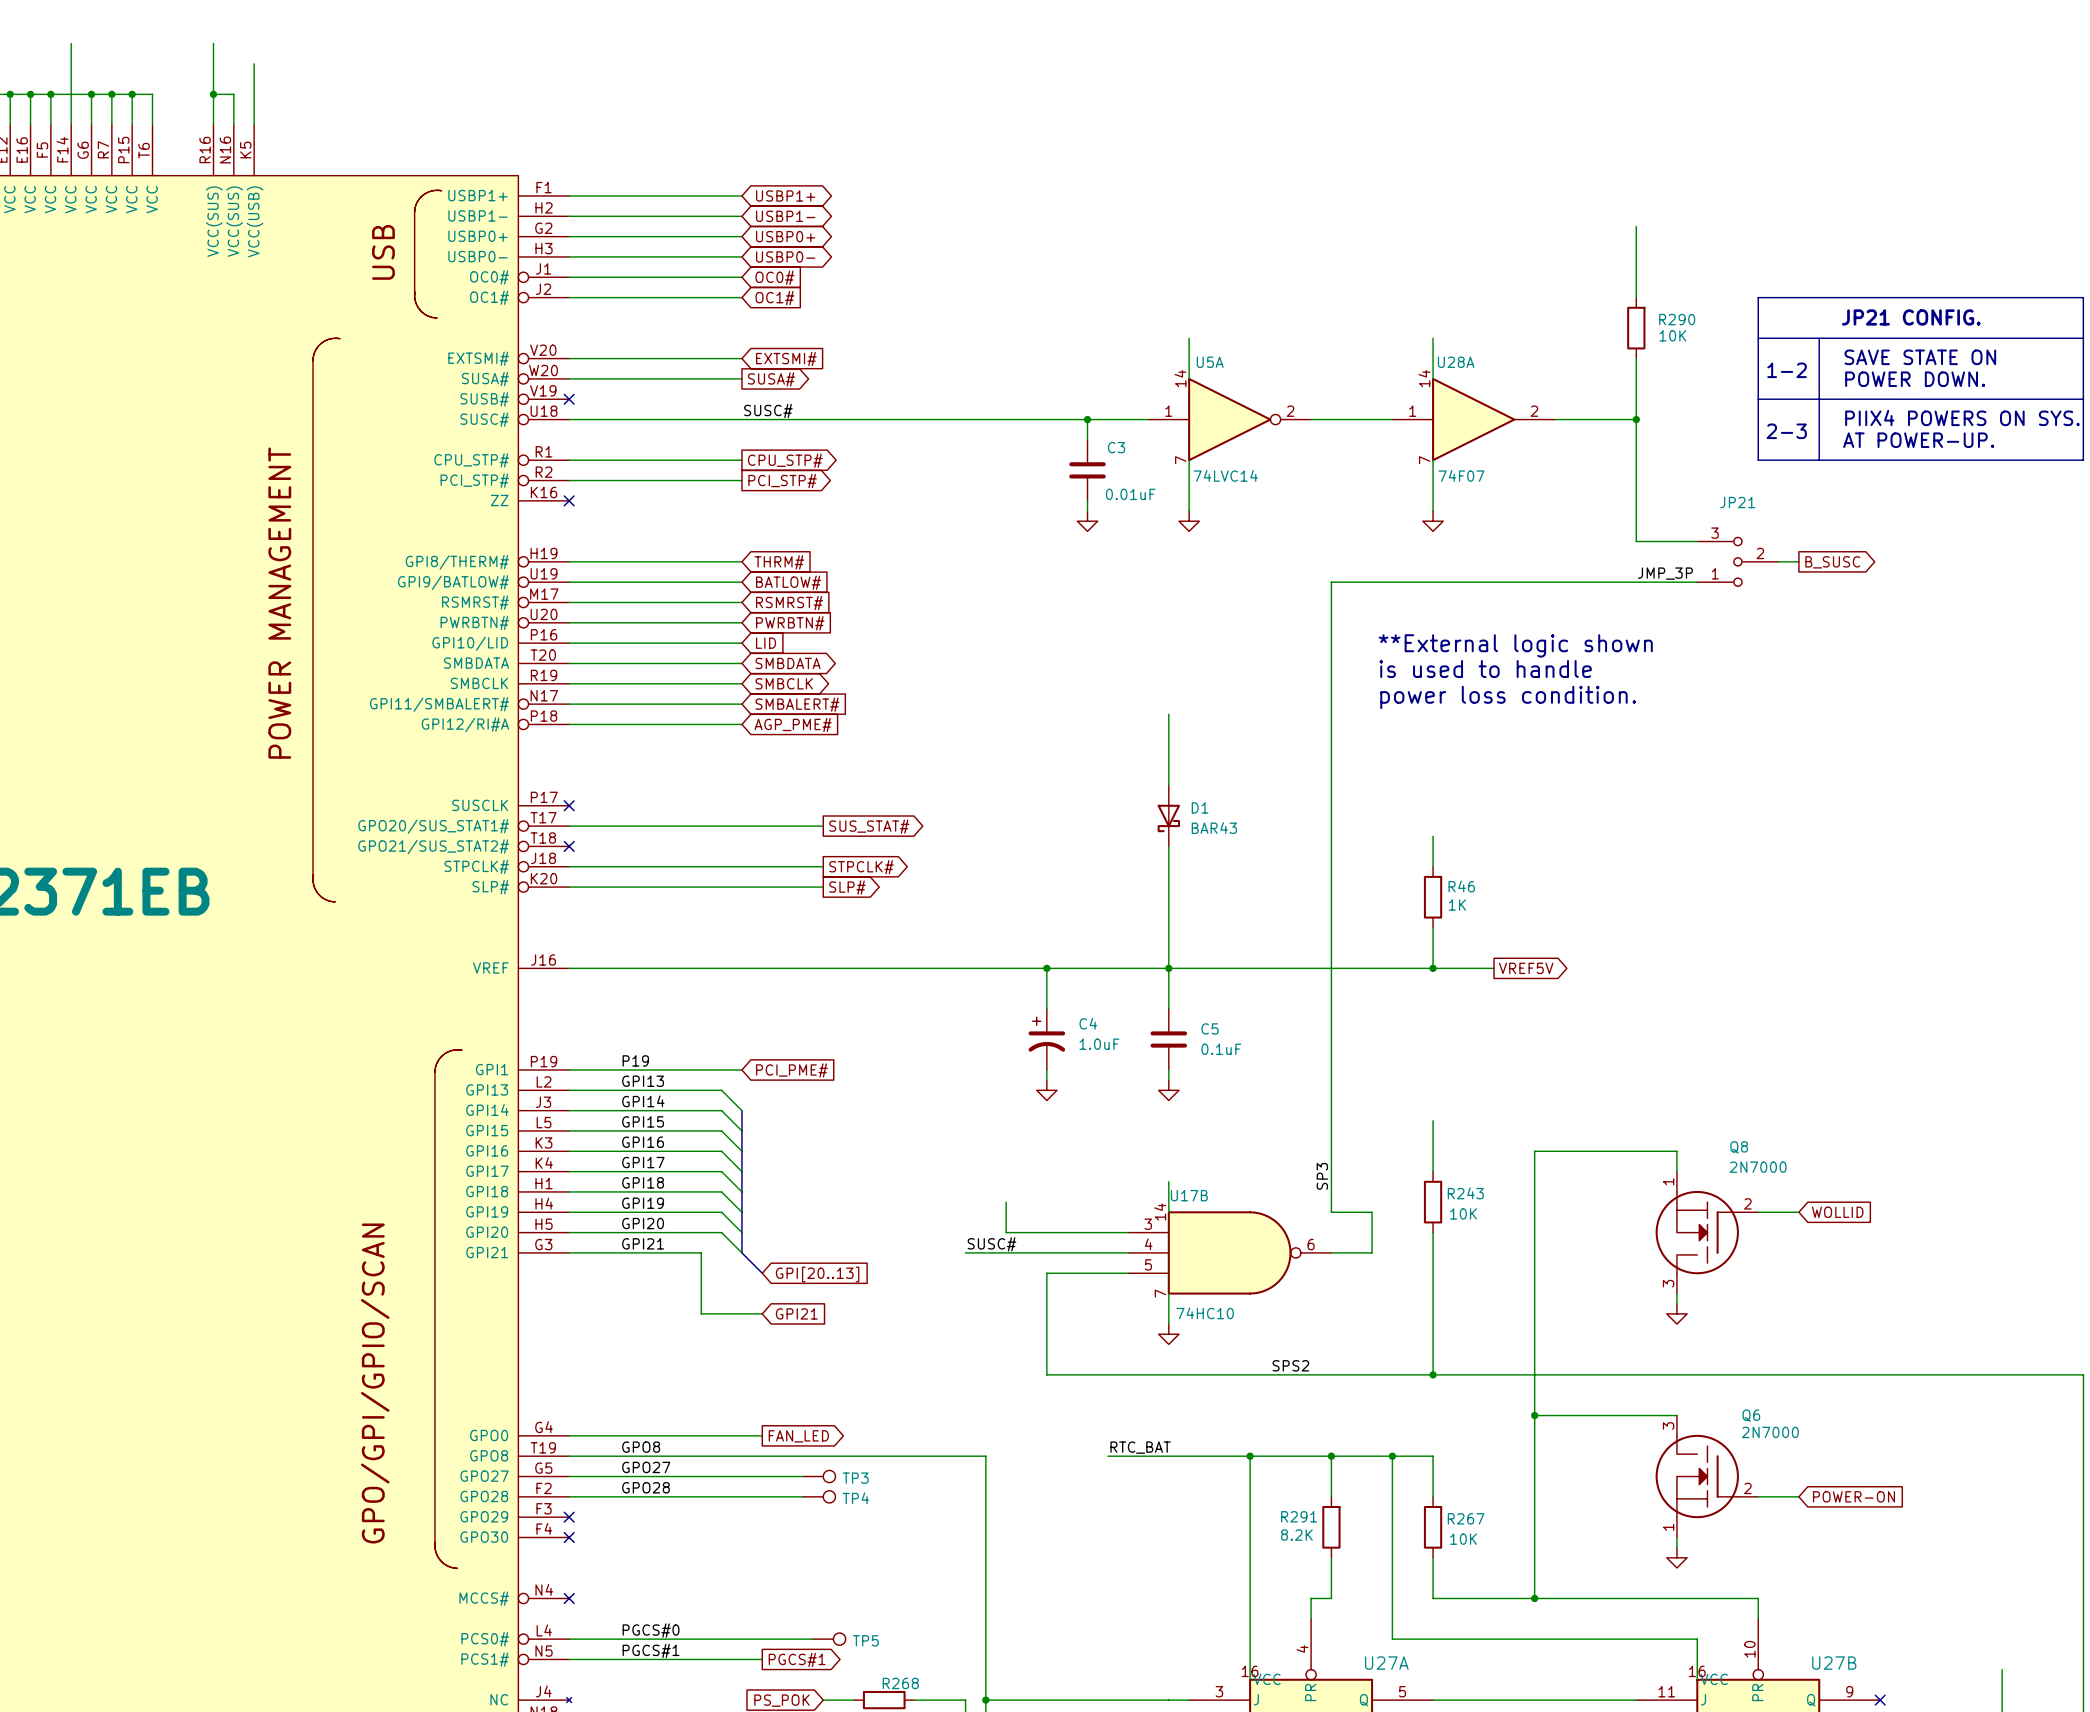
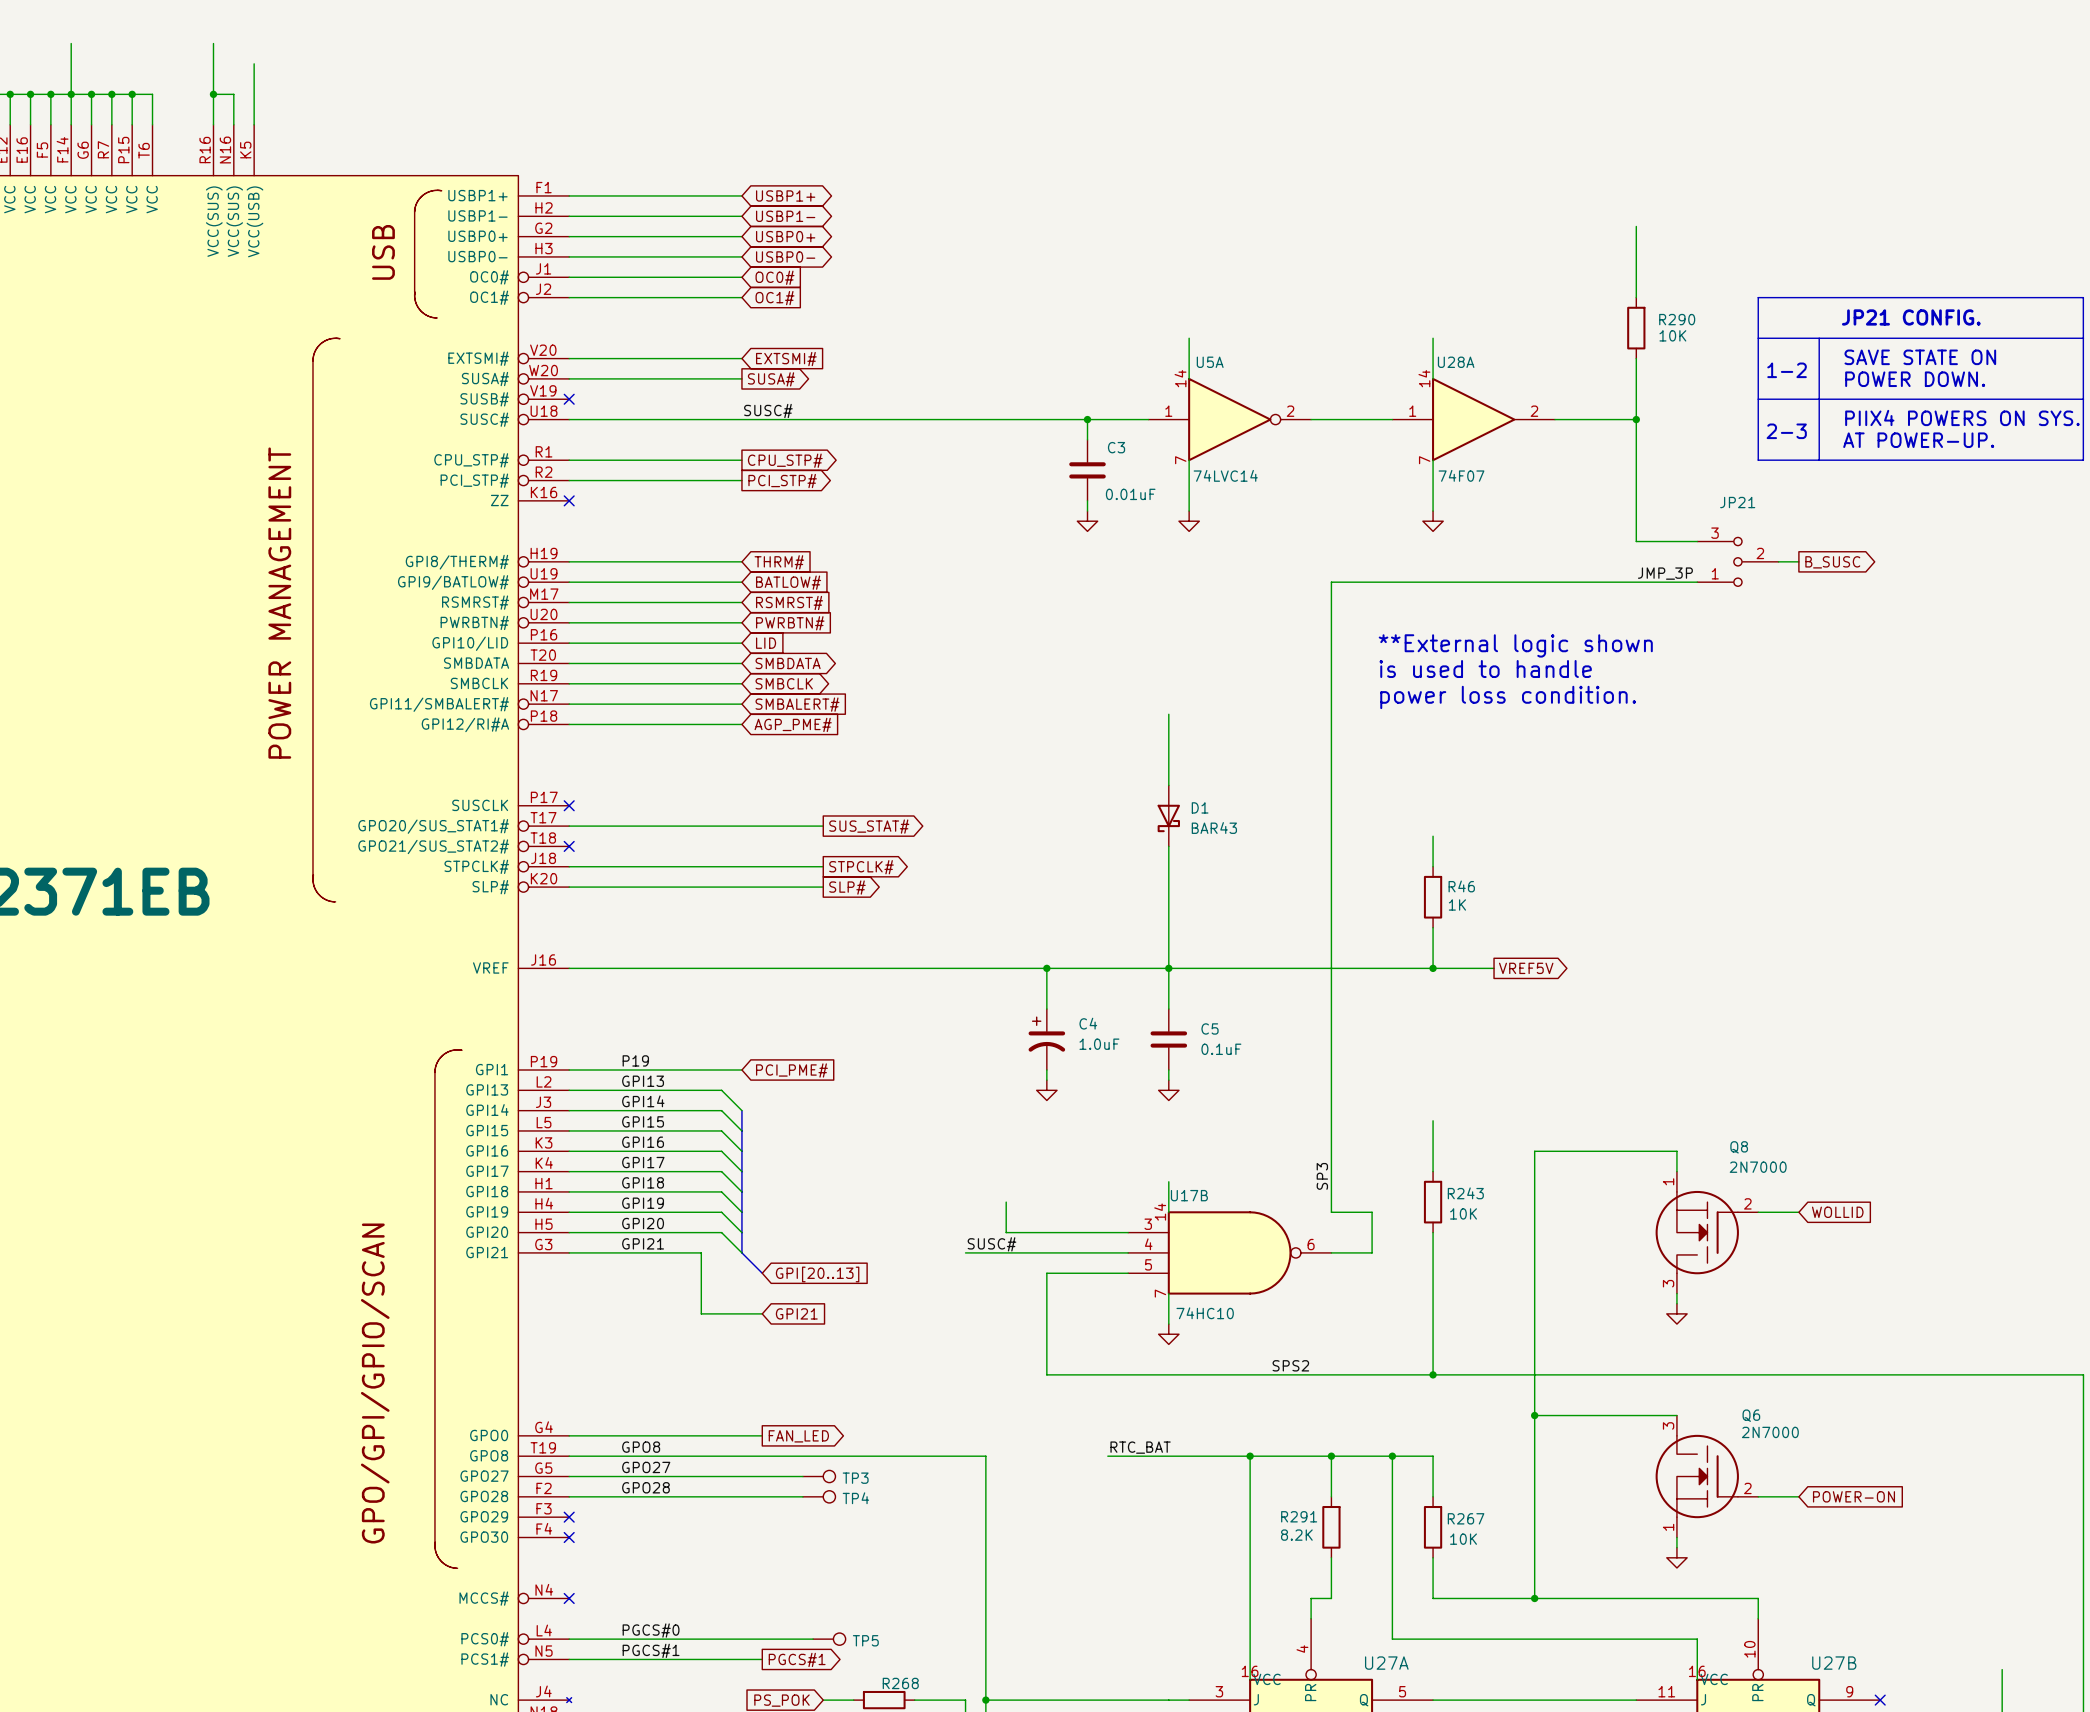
junction: none -> (71, 94)

